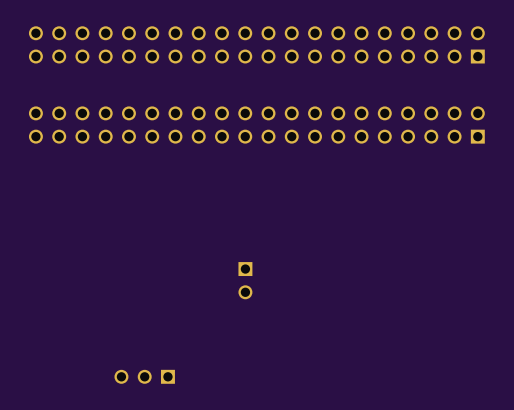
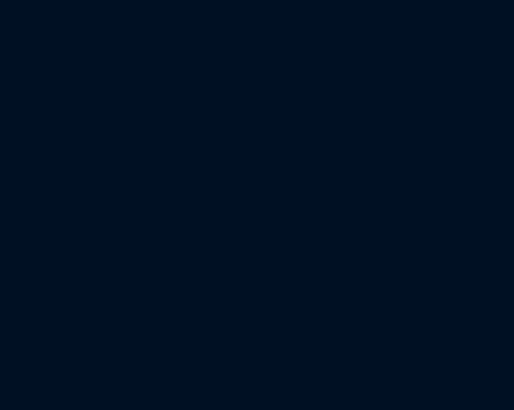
part: (256, 44) -> none
part: (256, 125) -> none
part: (245, 280) -> none
part: (144, 376) -> none

